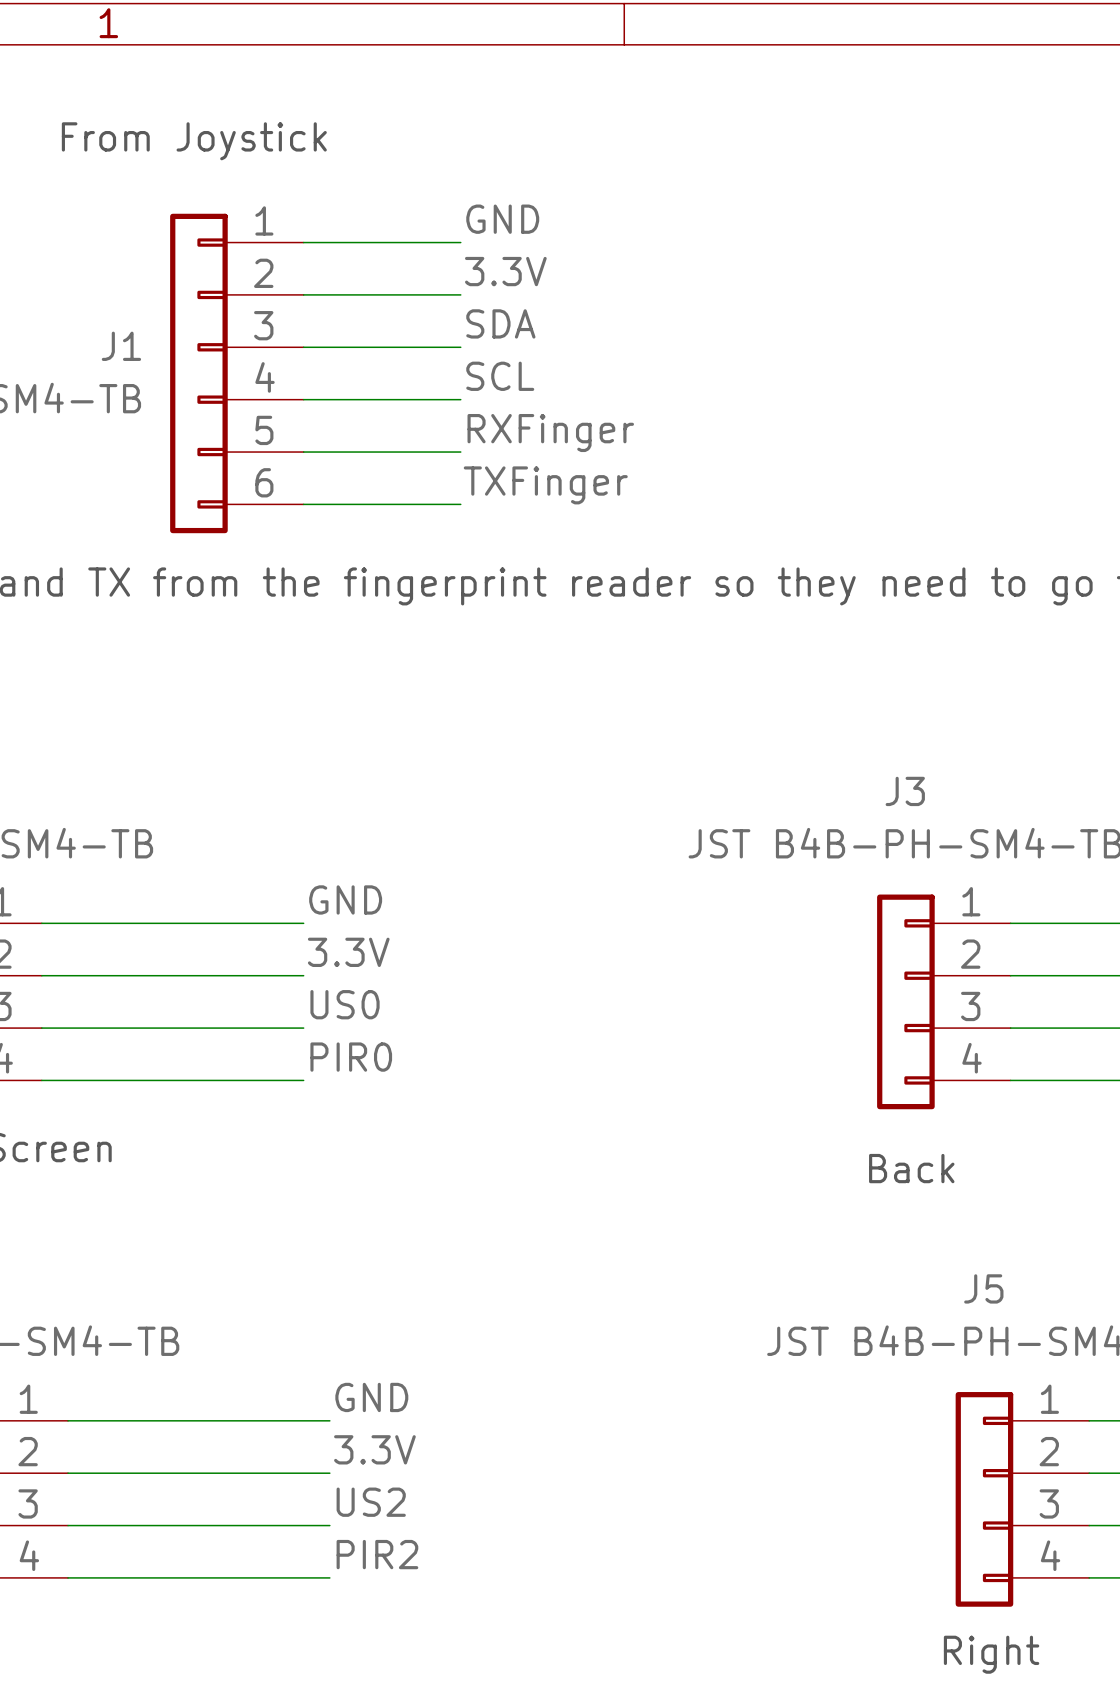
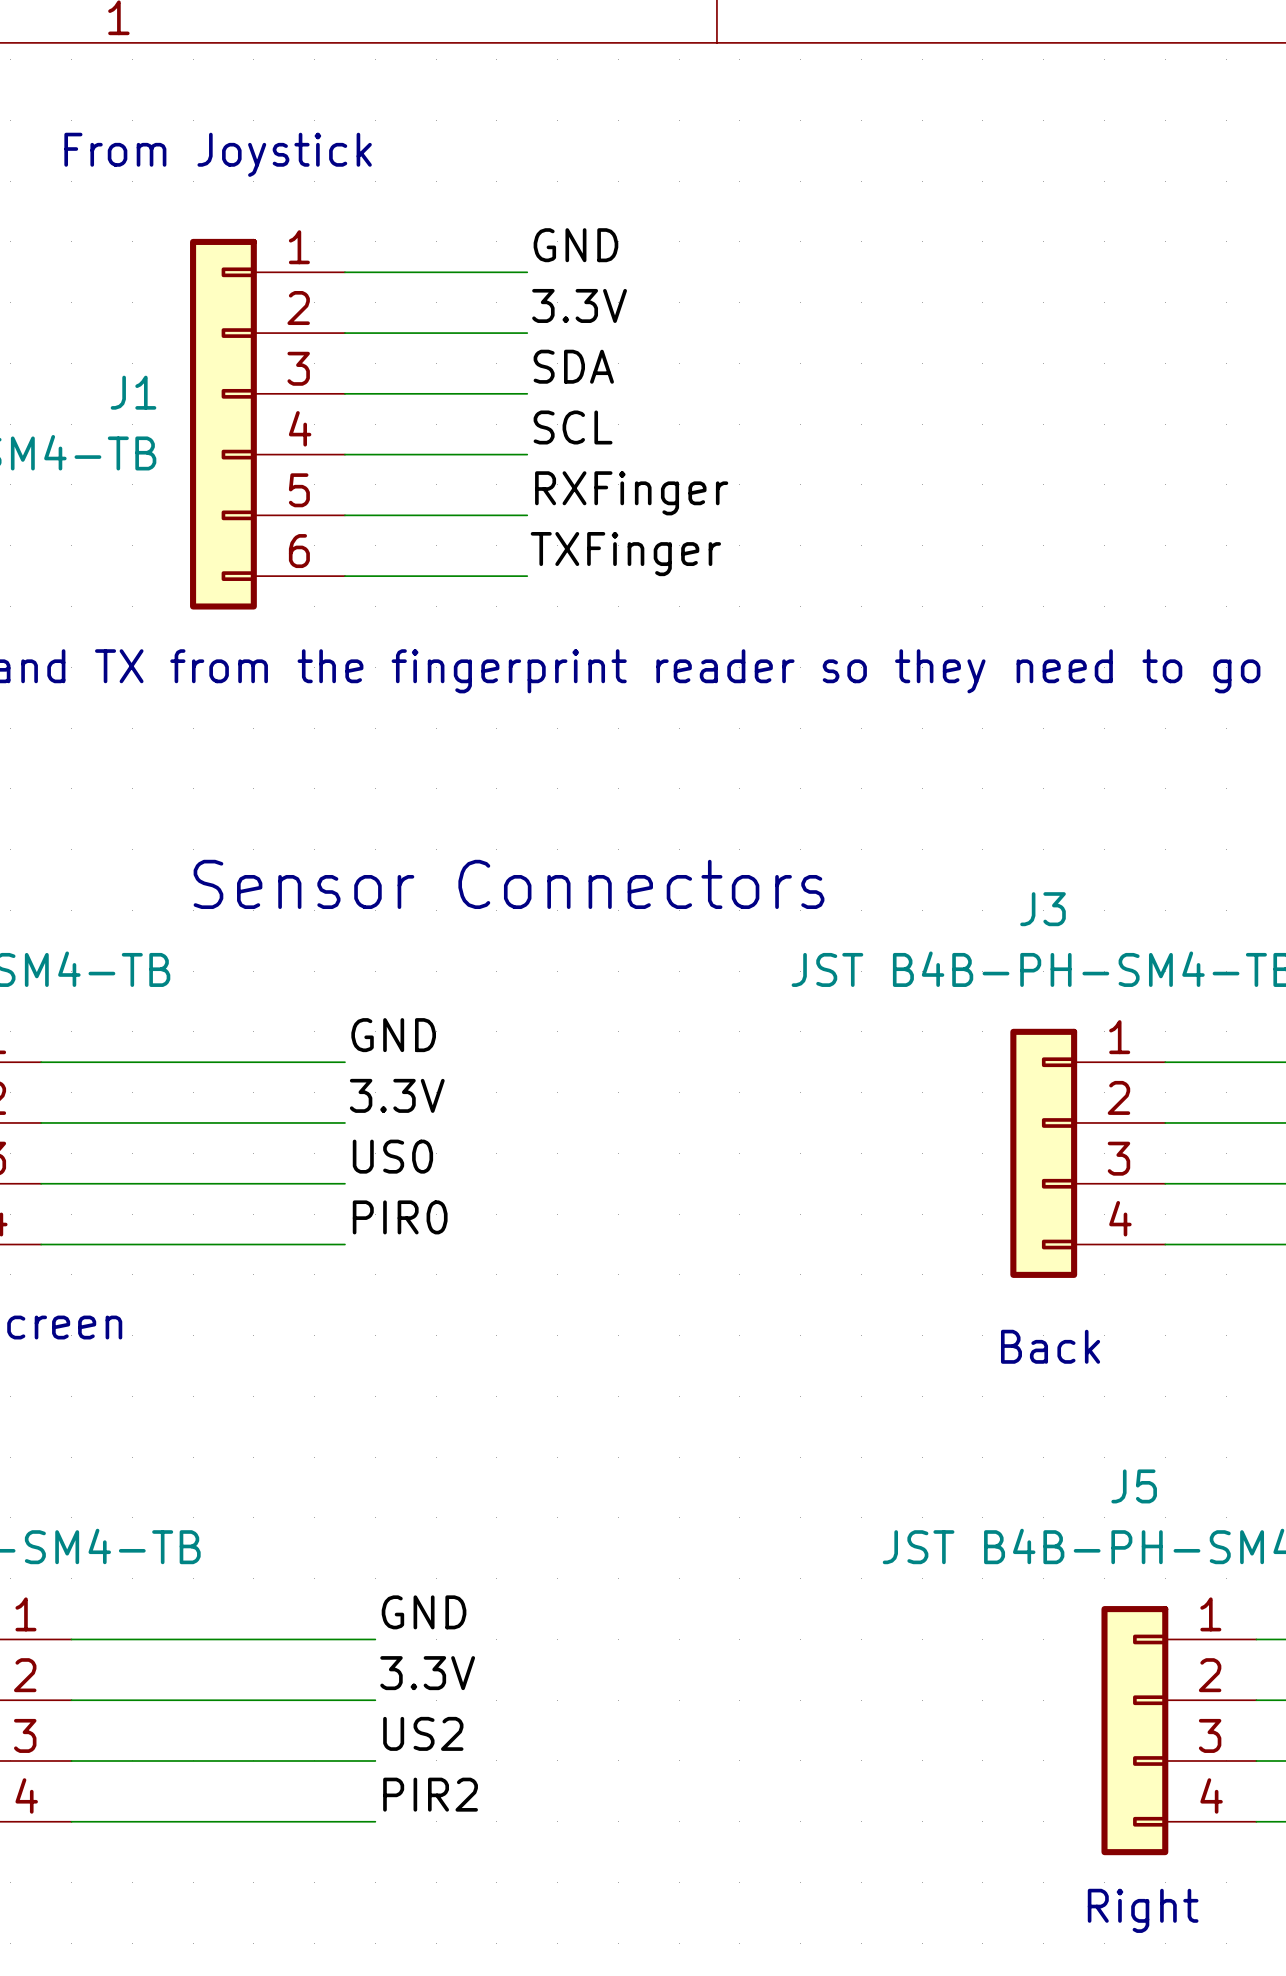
text: none -> Sensor Connectors (509, 884)

